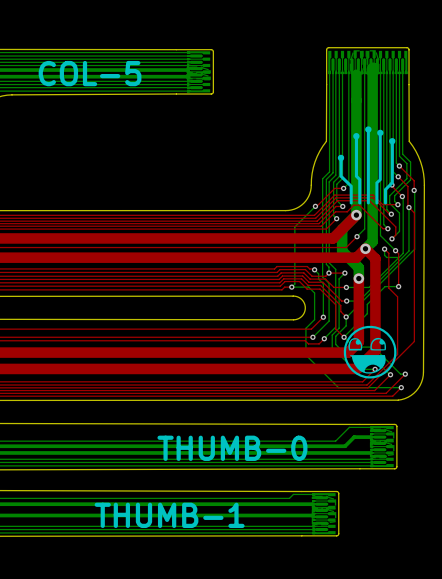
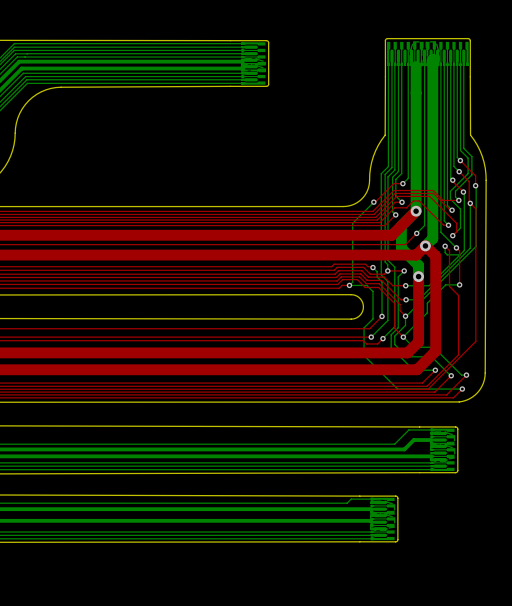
text: COL-5 (90, 73) -> none
drawing: [337, 126, 396, 205] -> none
drawing: [343, 325, 397, 379] -> none
text: THUMB-0 (232, 448) -> none
text: THUMB-1 (169, 515) -> none

